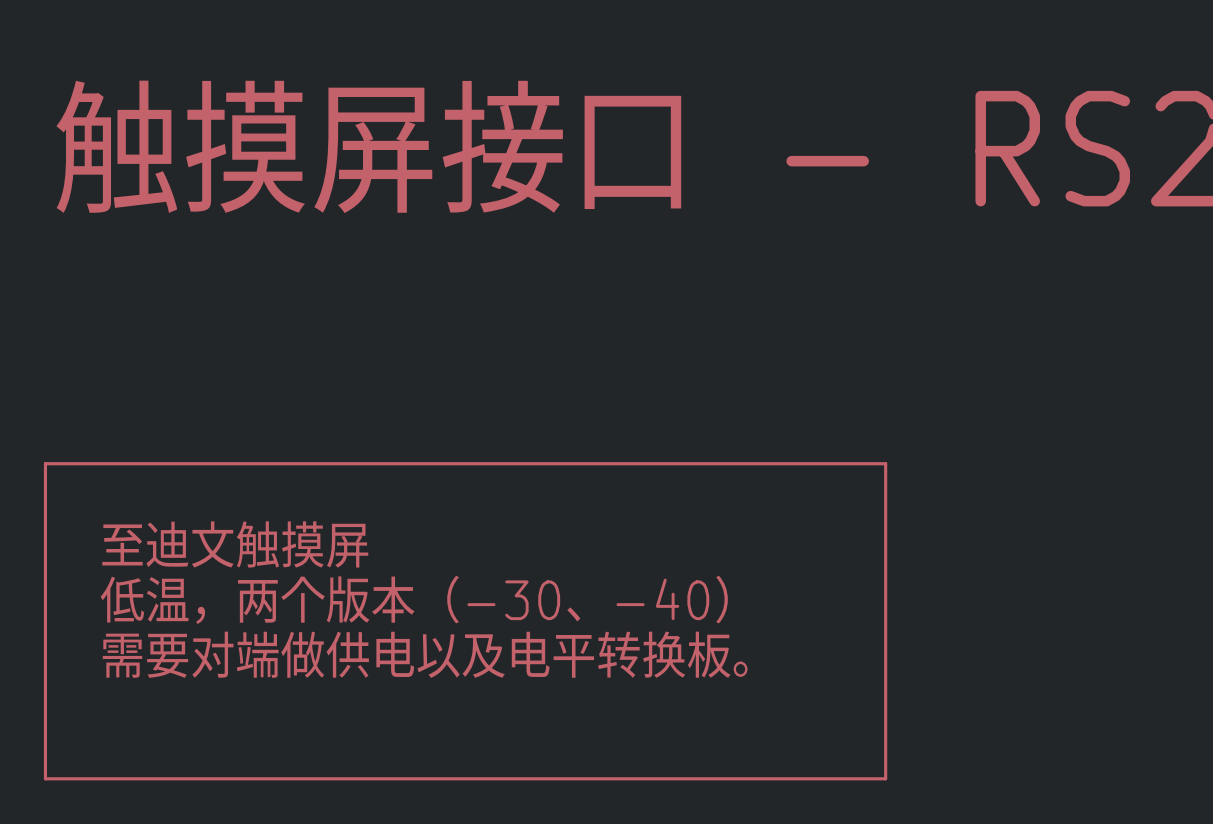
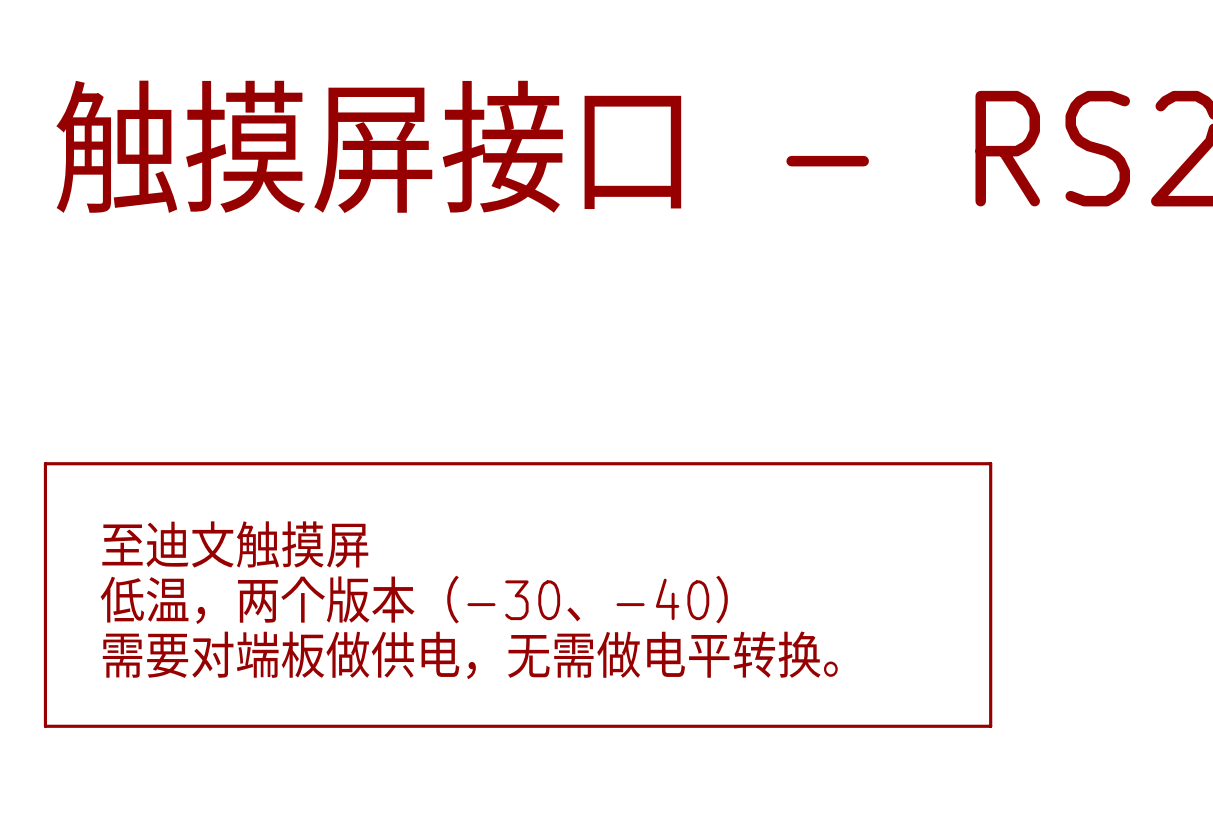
line: (885, 463) (885, 778) (45, 778) (45, 726) -> (885, 463) (990, 463) (990, 726) (45, 726)
text: 需要对端做供电以及电平转换板。 (425, 654) -> 需要对端板做供电，无需做电平转换。 (470, 655)

